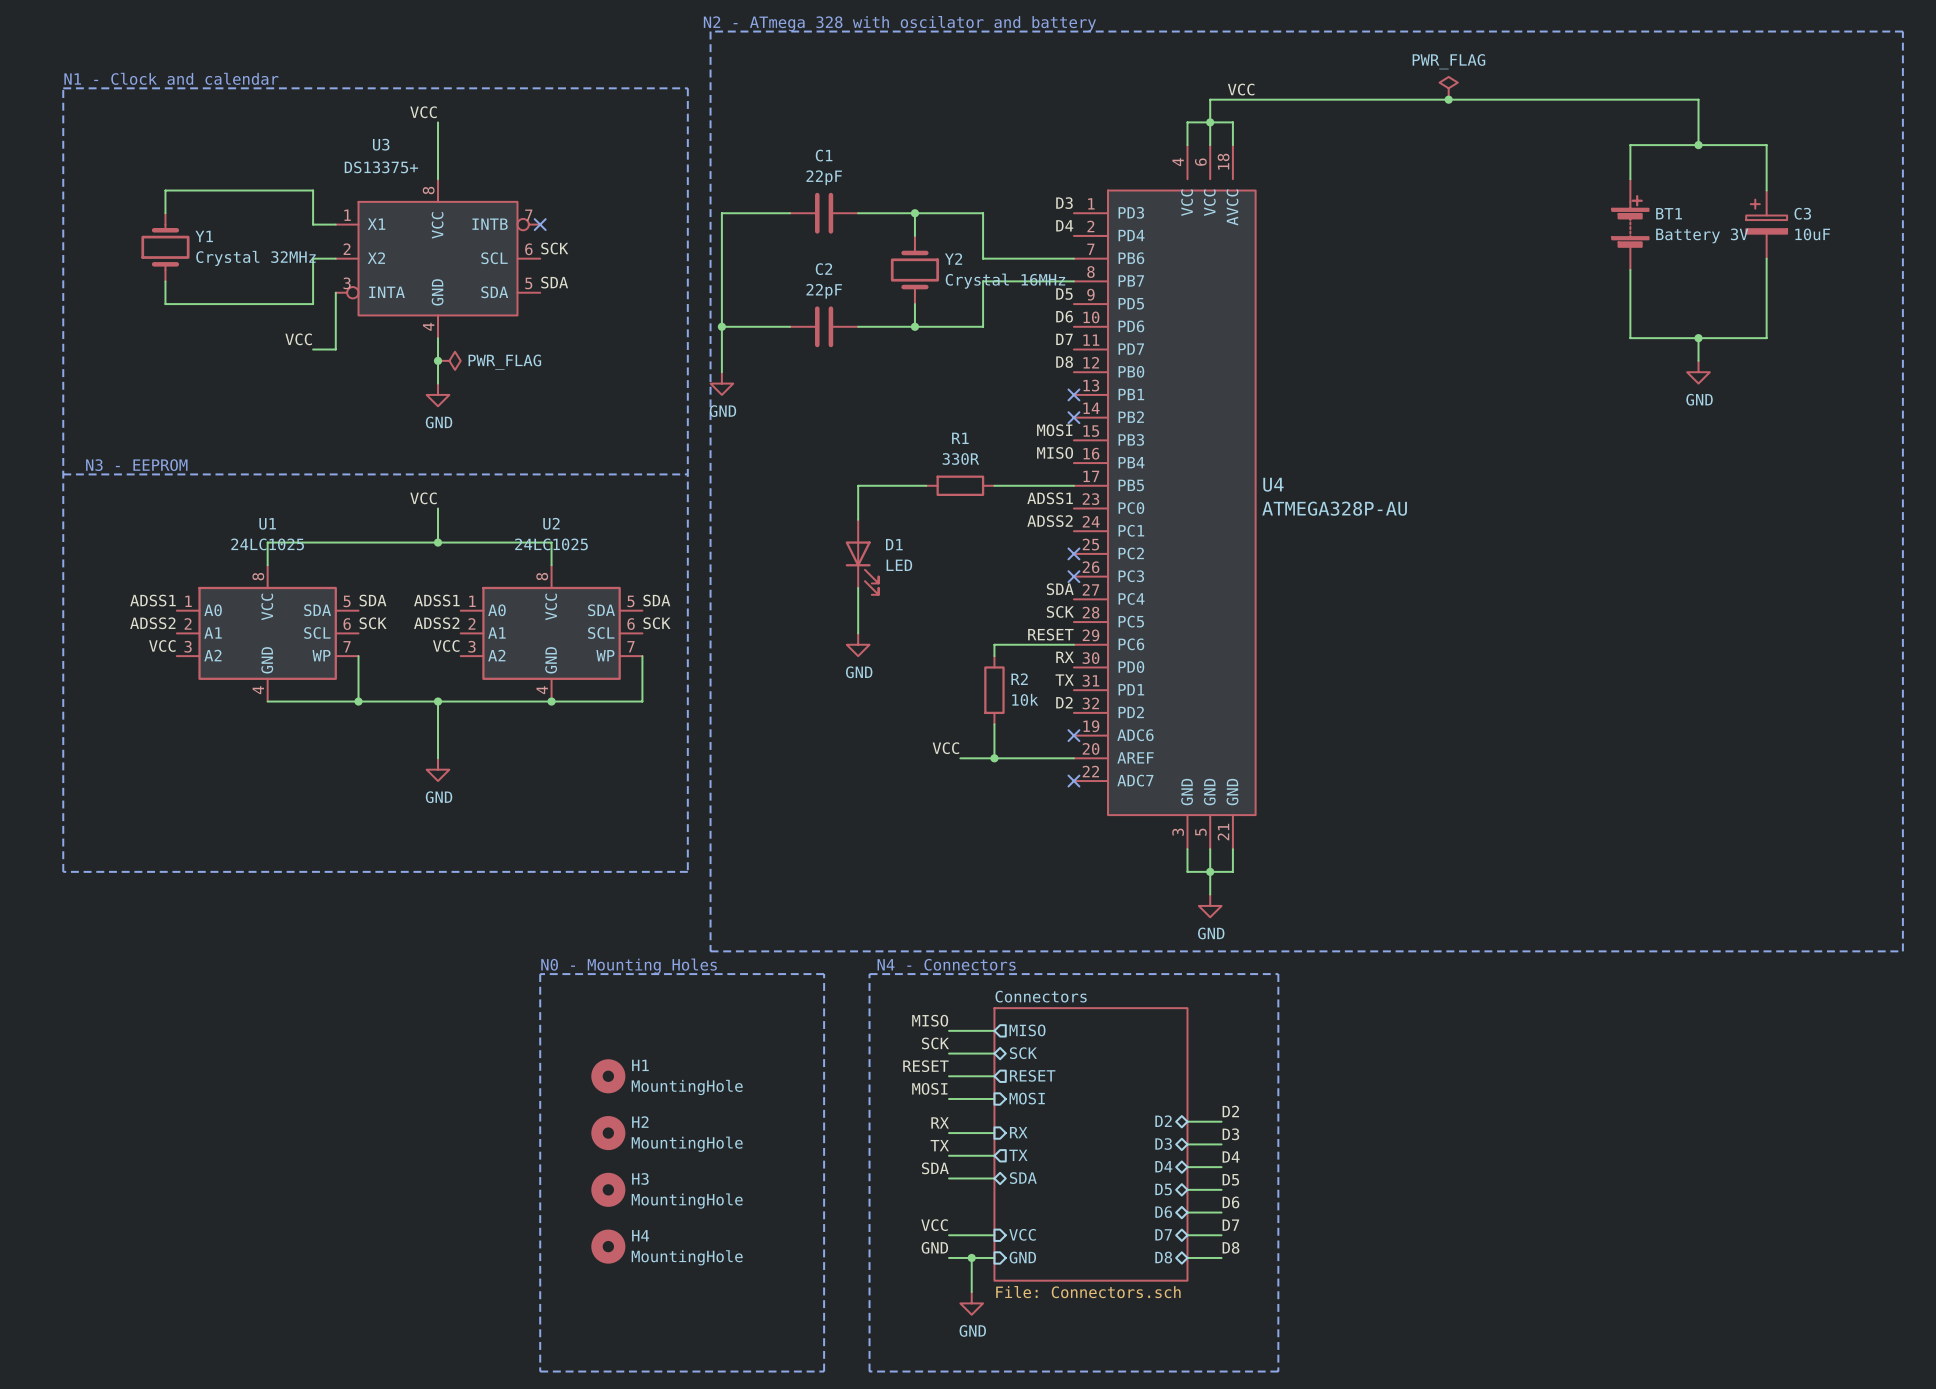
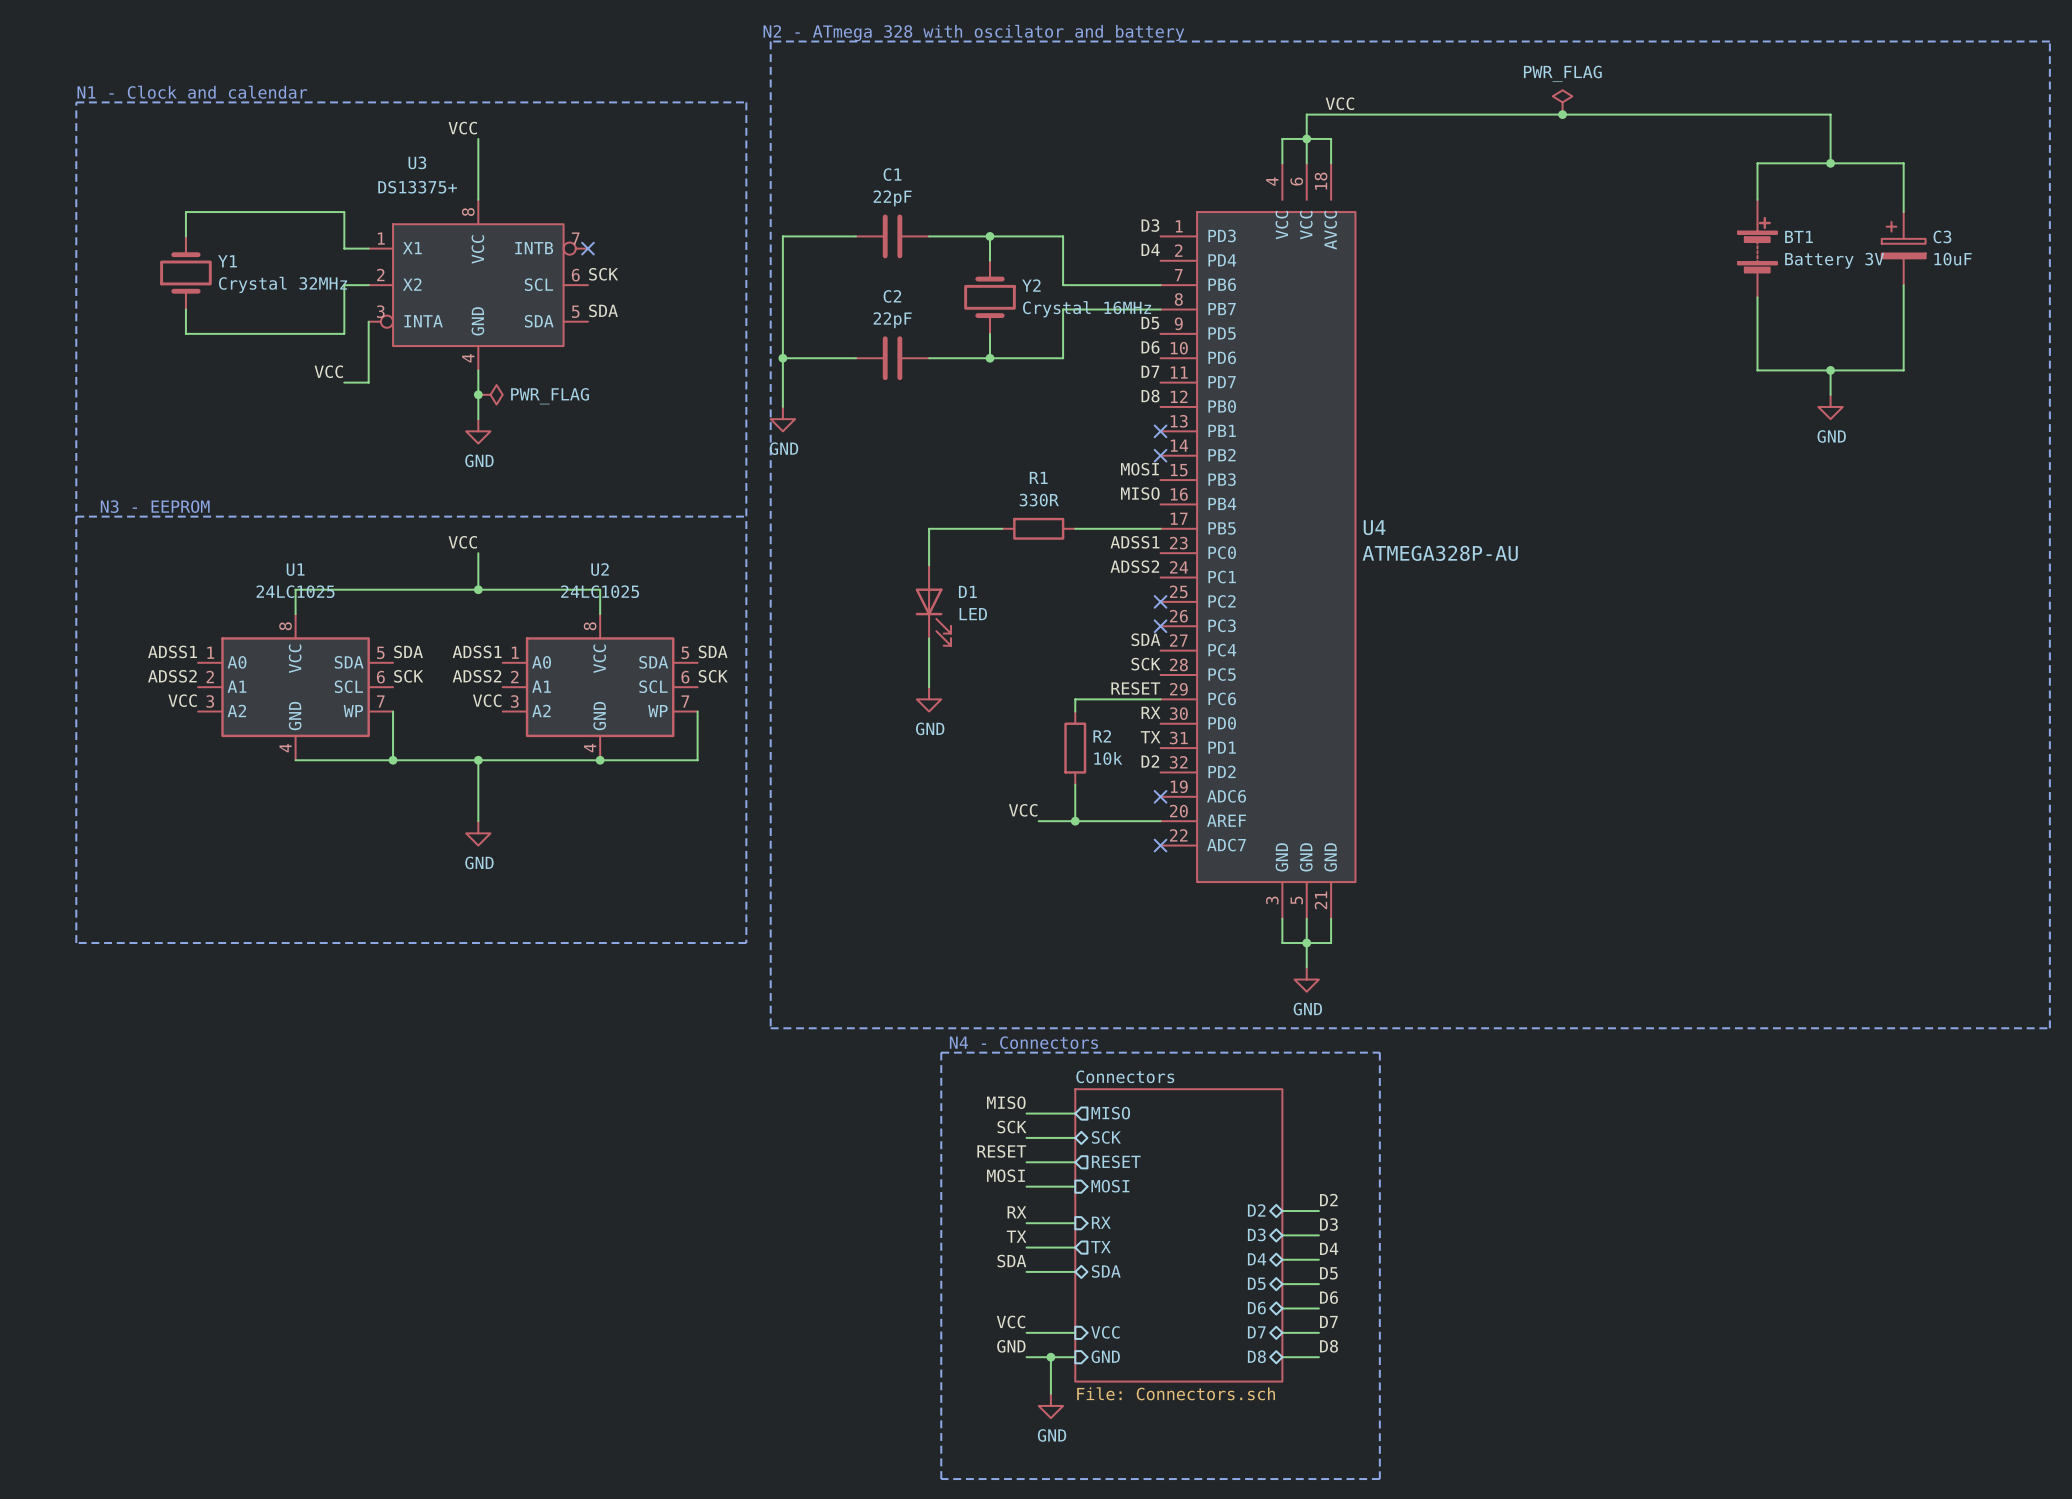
text: N0 - Mounting Holes (629, 966) -> none
line: (540, 974) (824, 974) (824, 1371) (540, 1371) (540, 974) -> none
H1: MountingHole (608, 1076) -> none
H2: MountingHole (608, 1133) -> none
H3: MountingHole (608, 1189) -> none
H4: MountingHole (608, 1246) -> none

